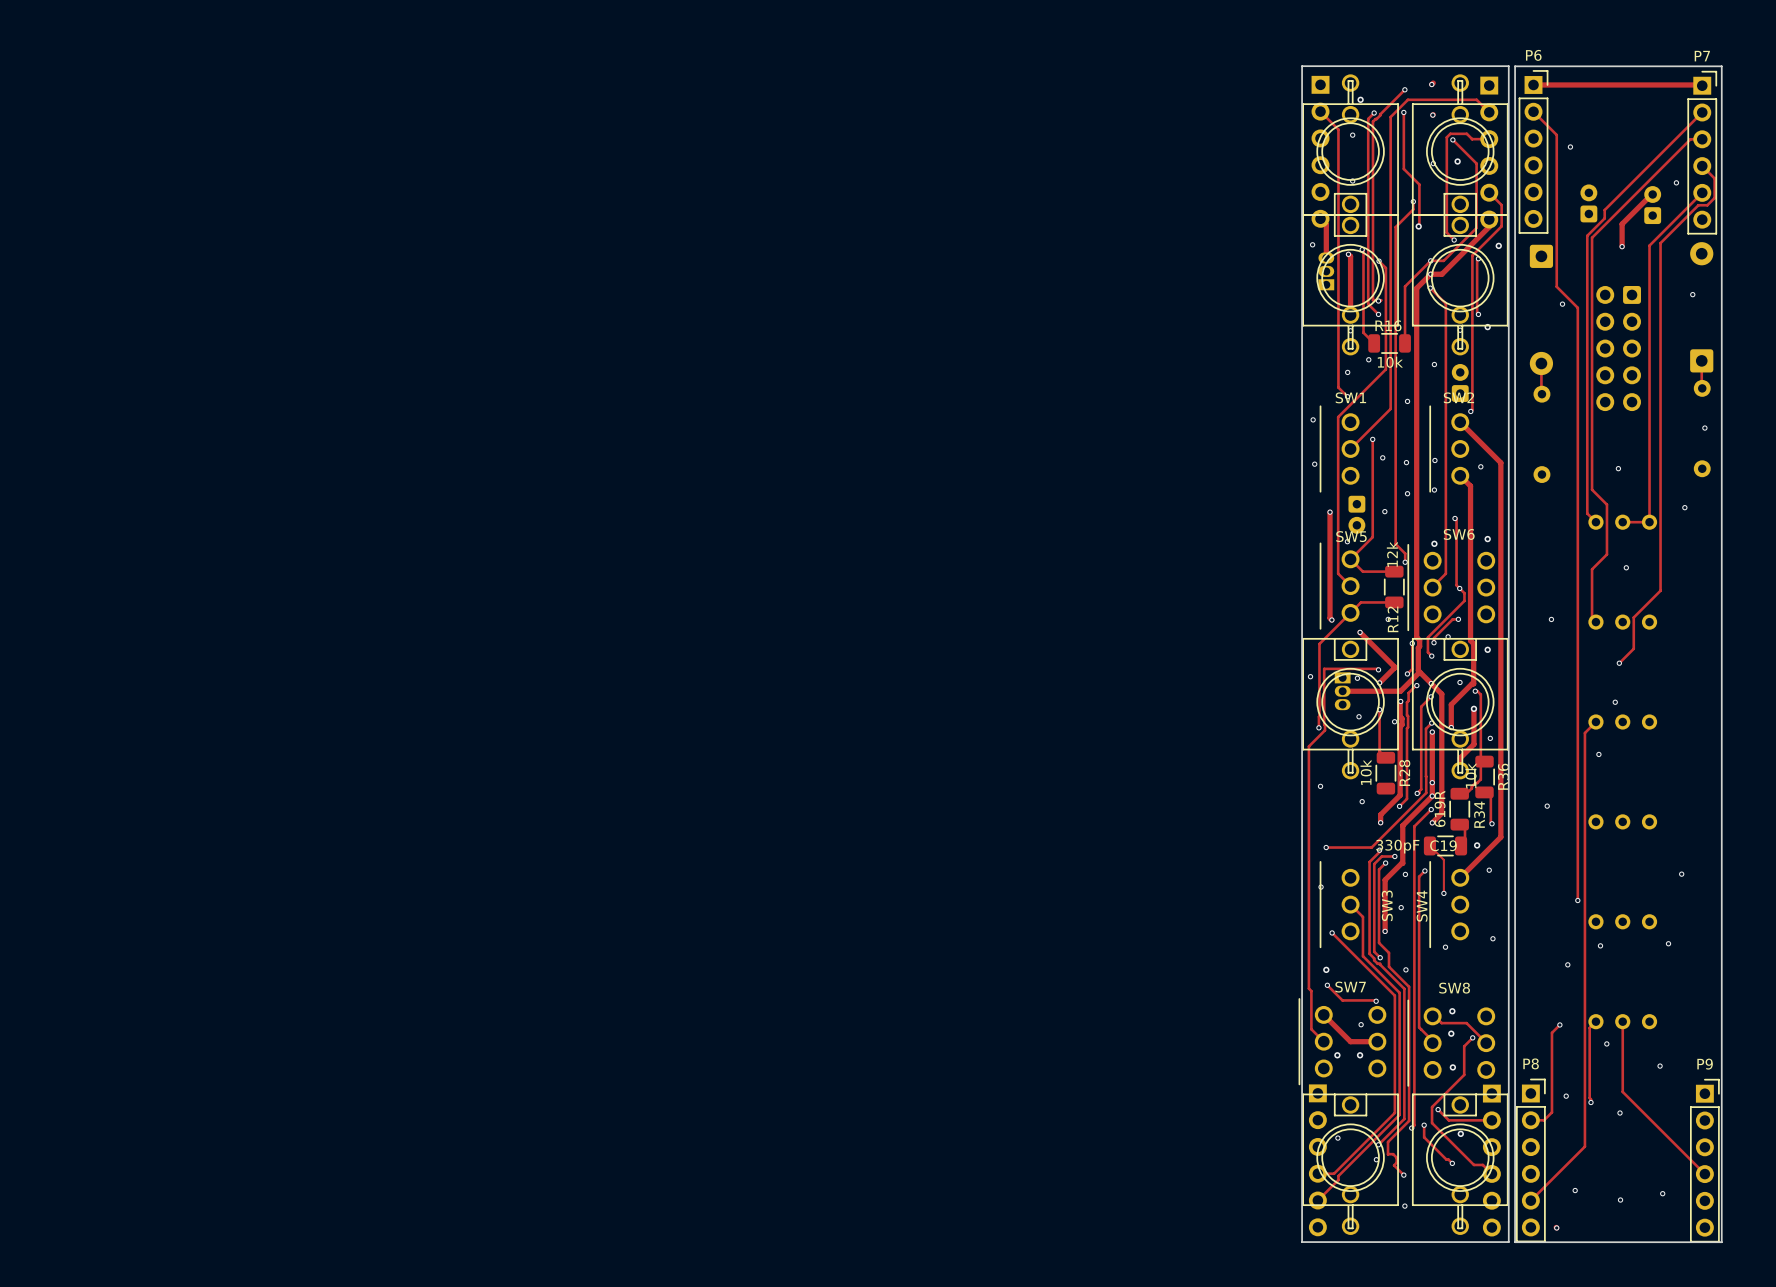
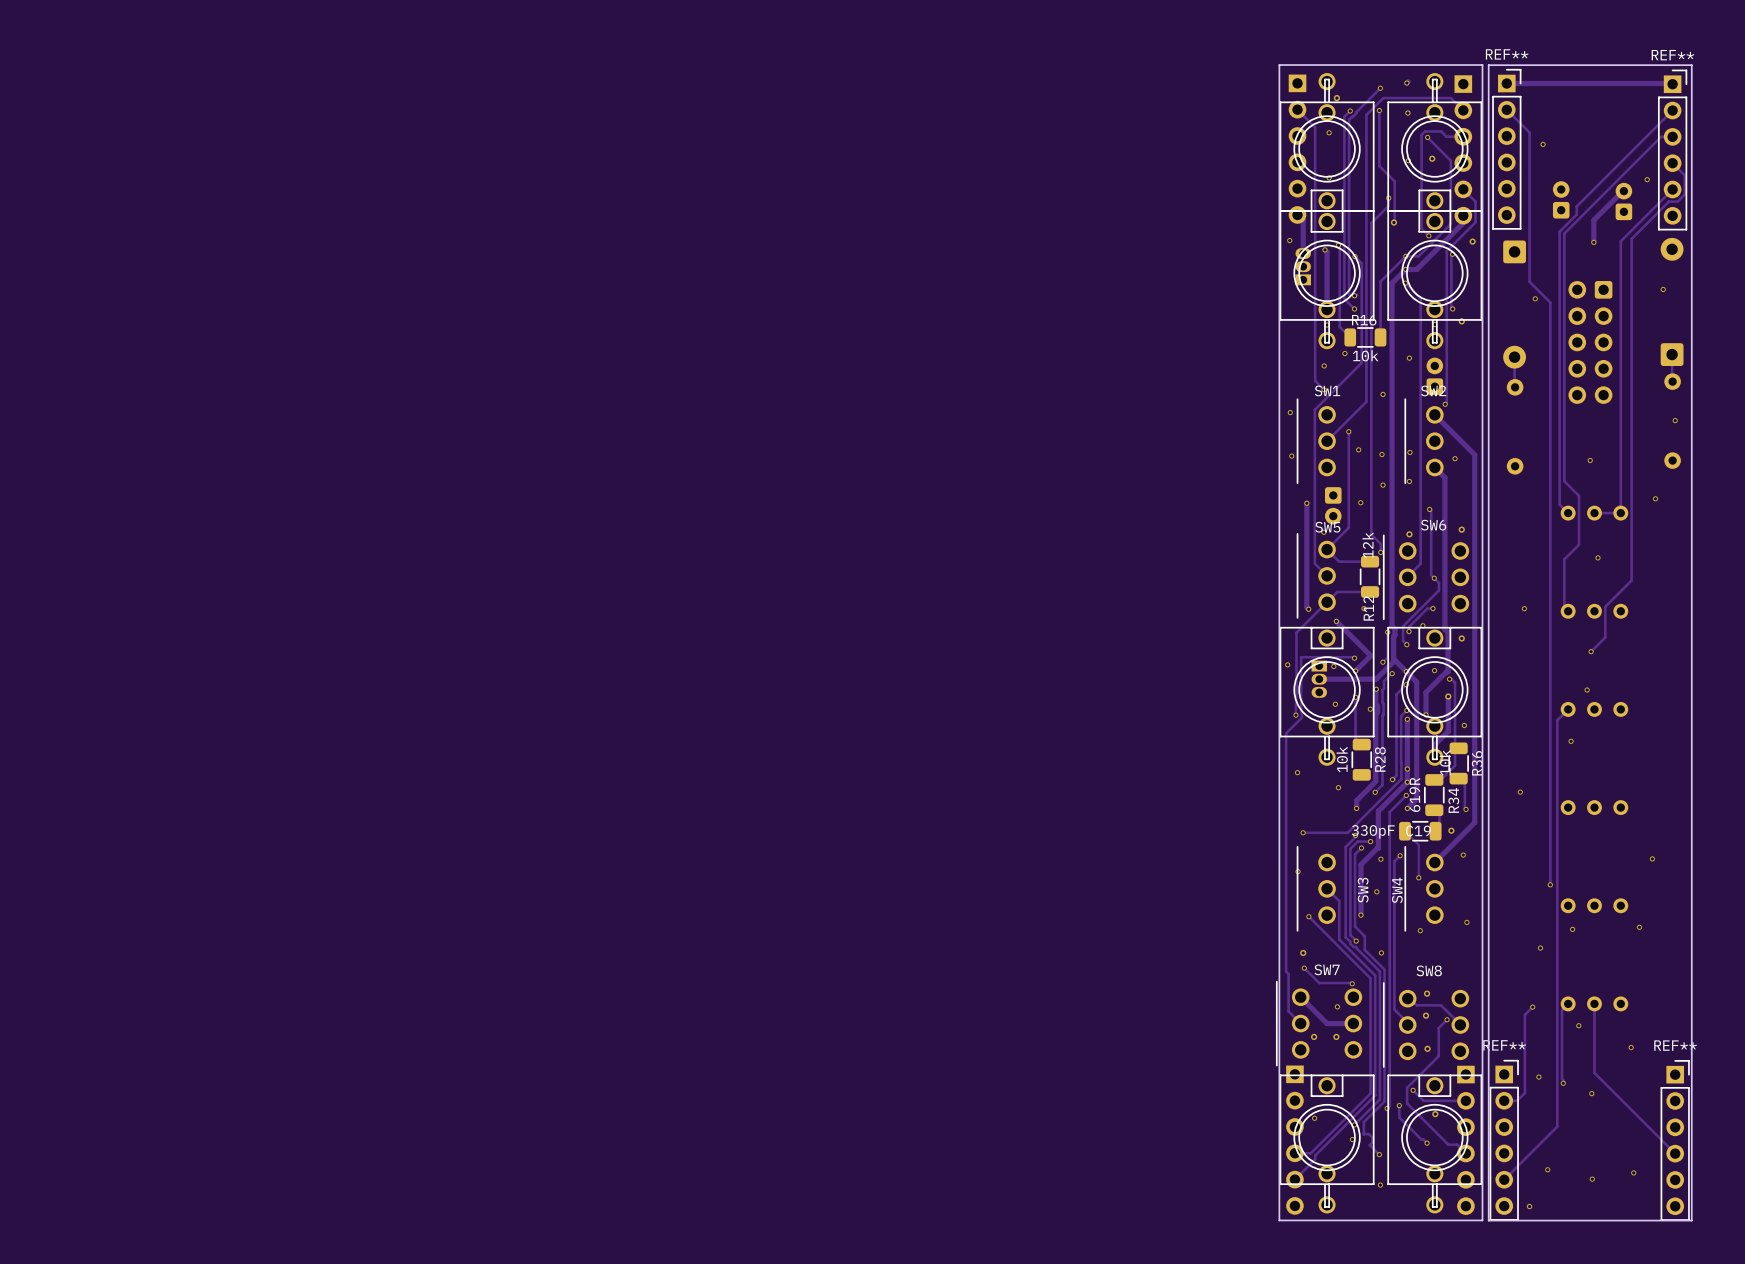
P6 name: P6 (1533, 55) -> REF** (1507, 54)
P7 name: P7 (1702, 56) -> REF** (1672, 55)
P8 name: P8 (1531, 1063) -> REF** (1504, 1045)
P9 name: P9 (1705, 1064) -> REF** (1675, 1045)

